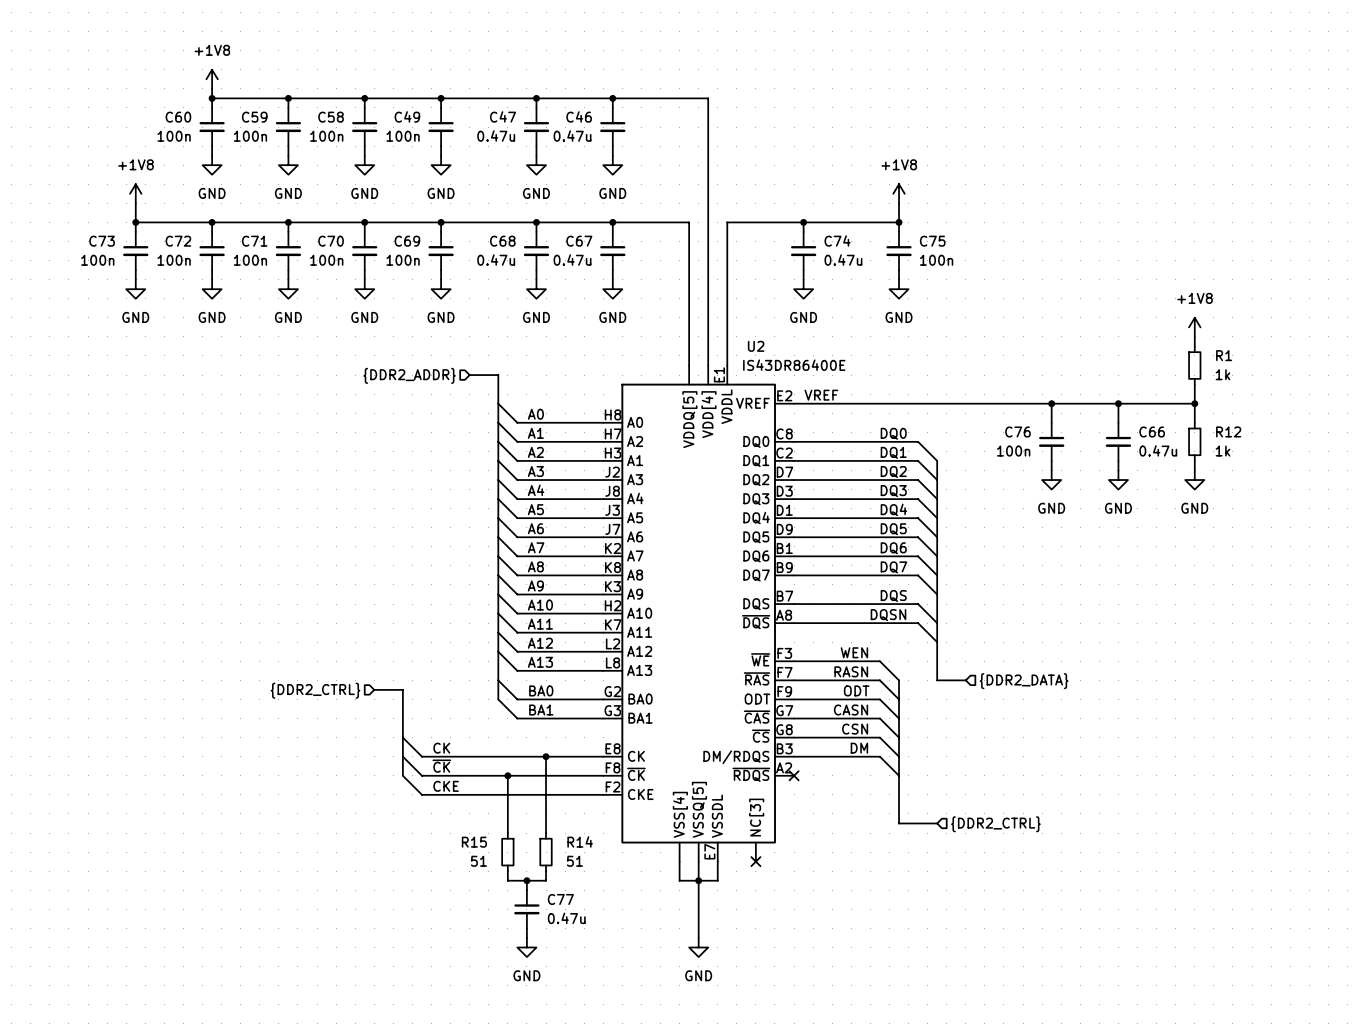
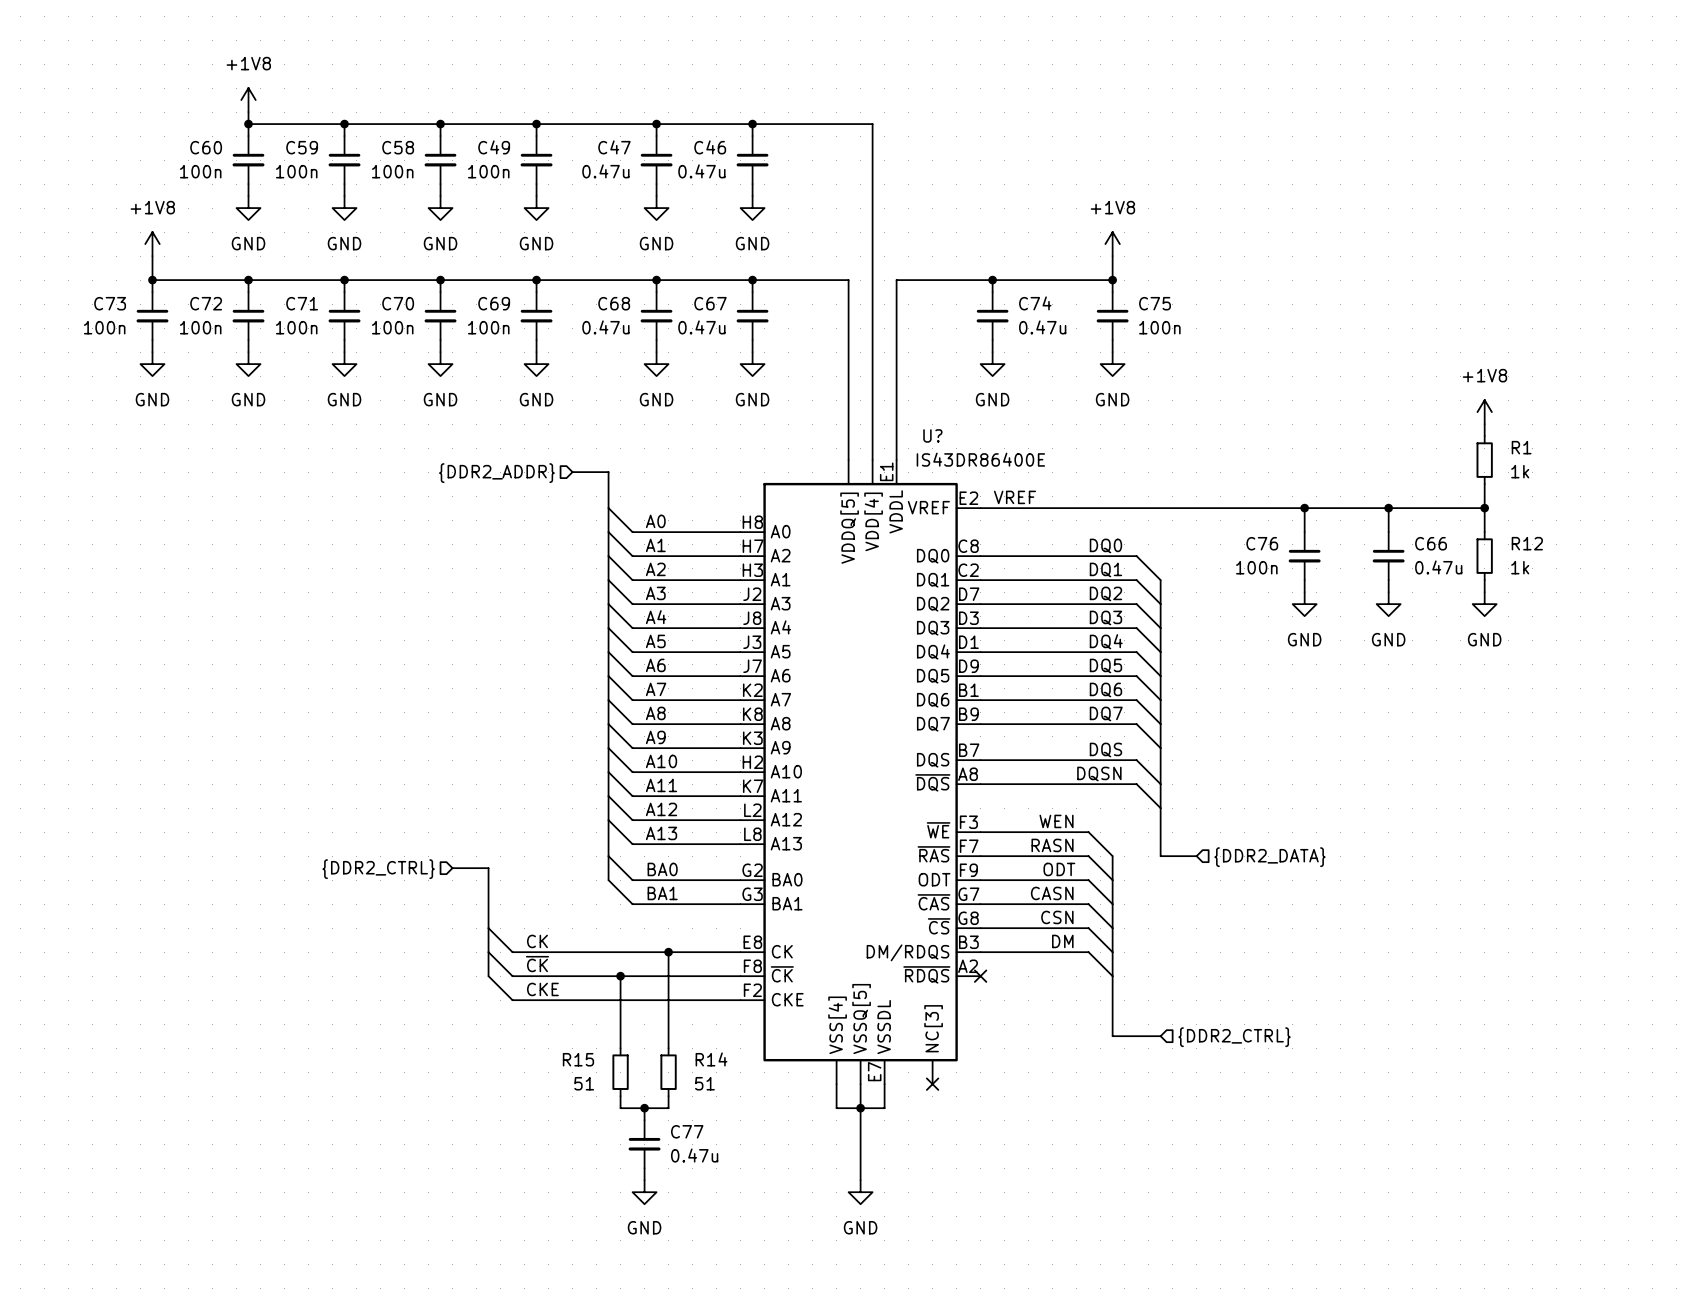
U2 name: U2 (756, 346) -> U? (932, 435)

